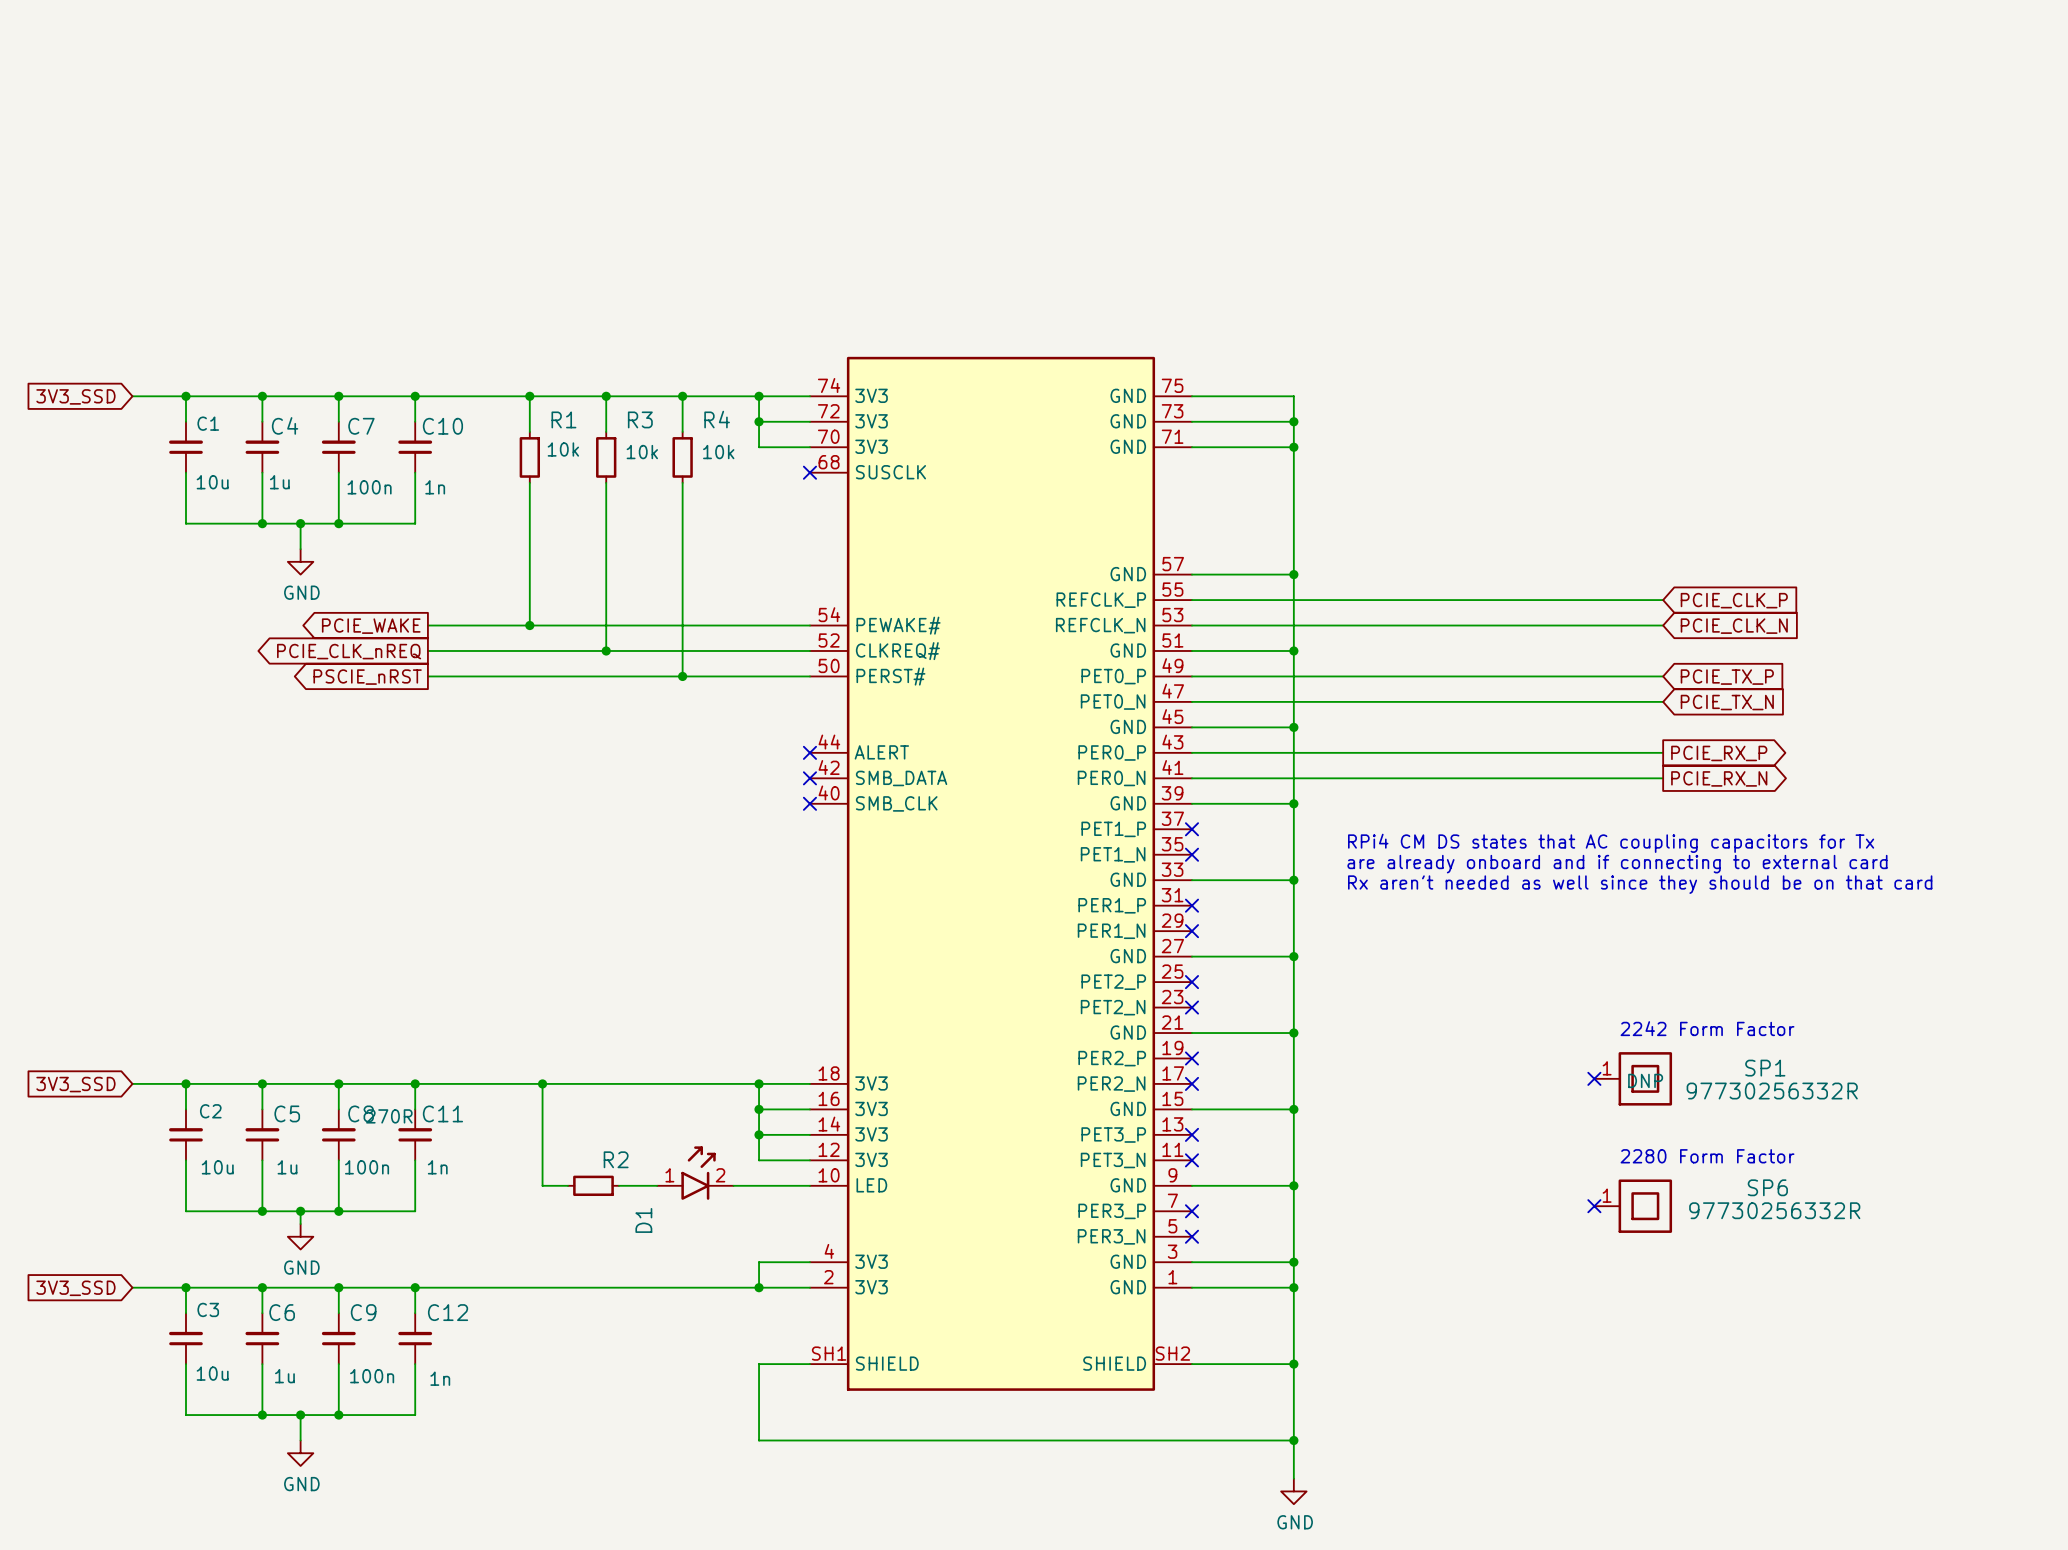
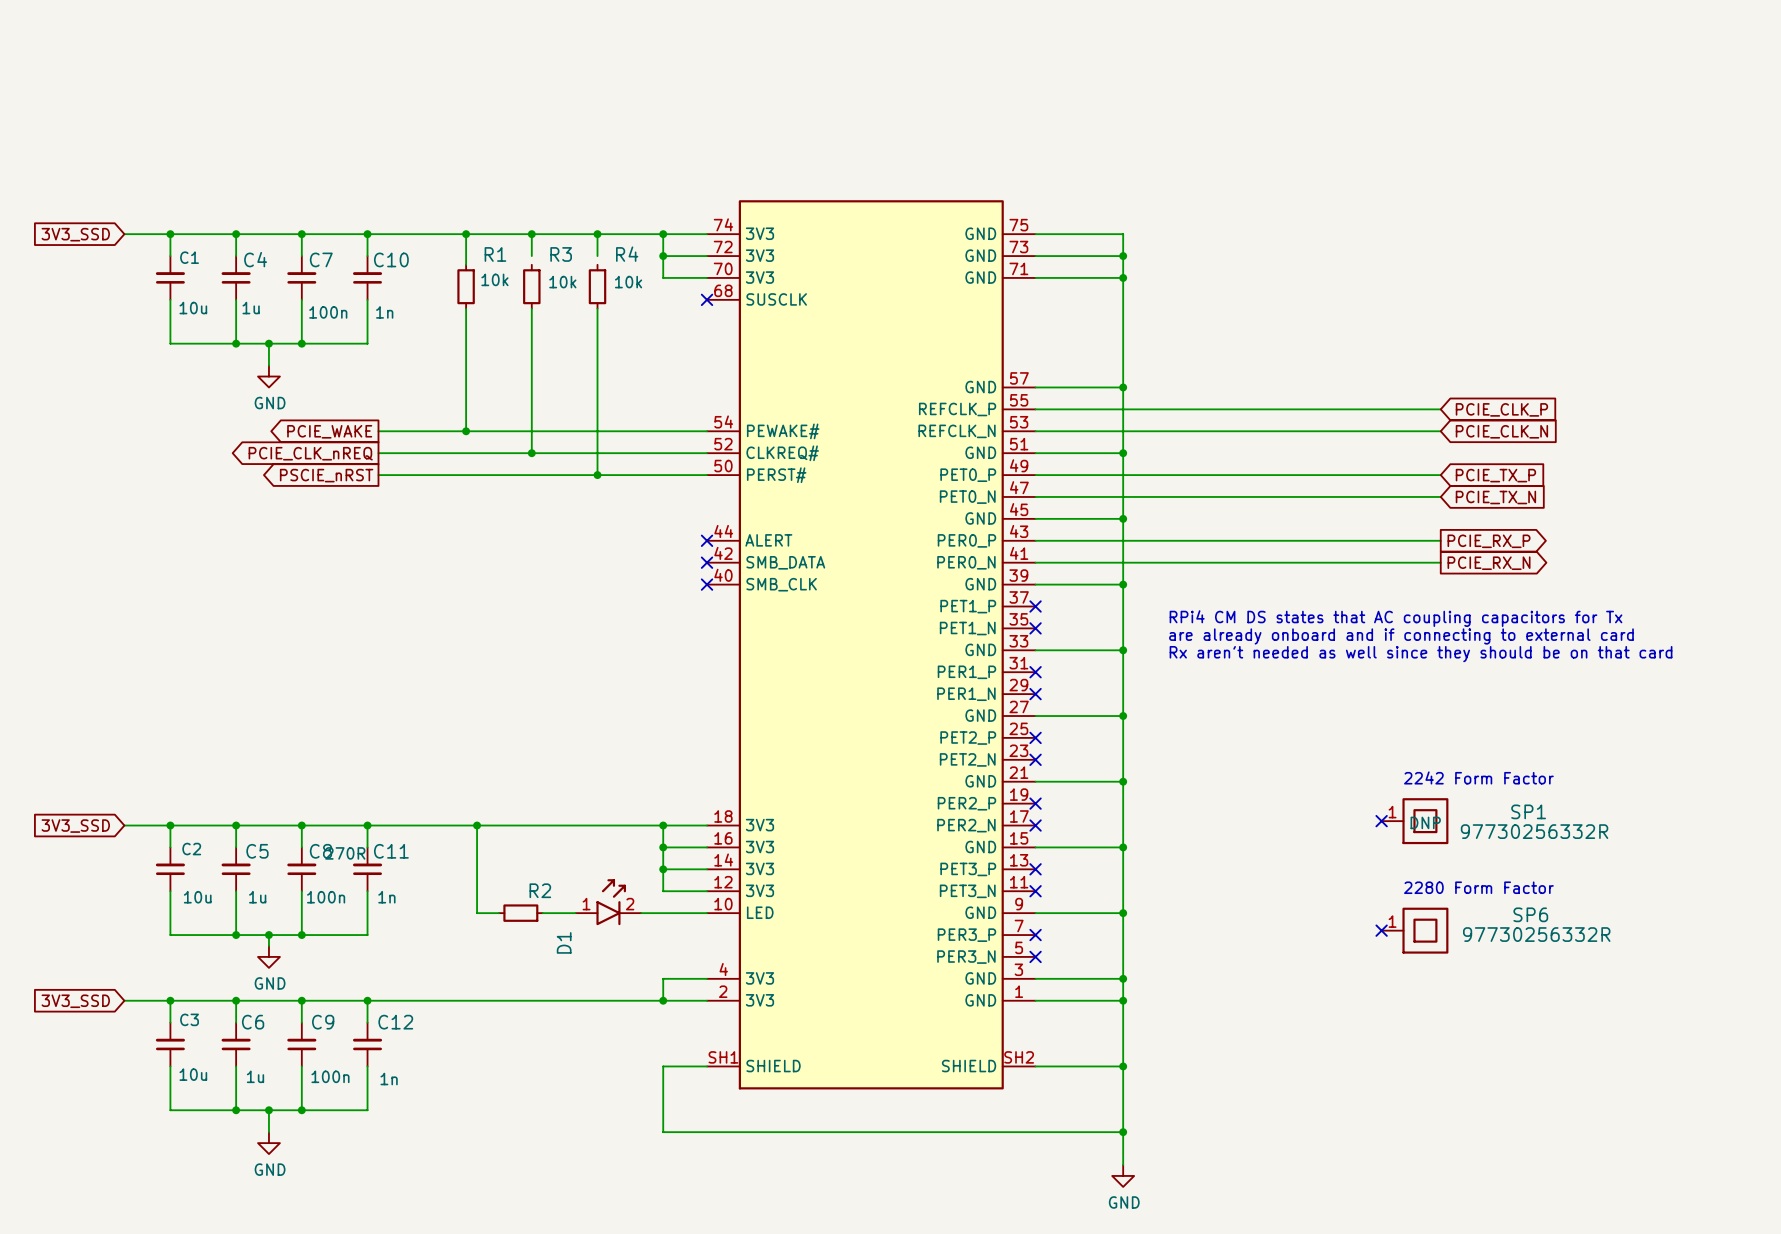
wire: (606, 421) (606, 431) -> none
wire: (682, 421) (682, 431) -> none

